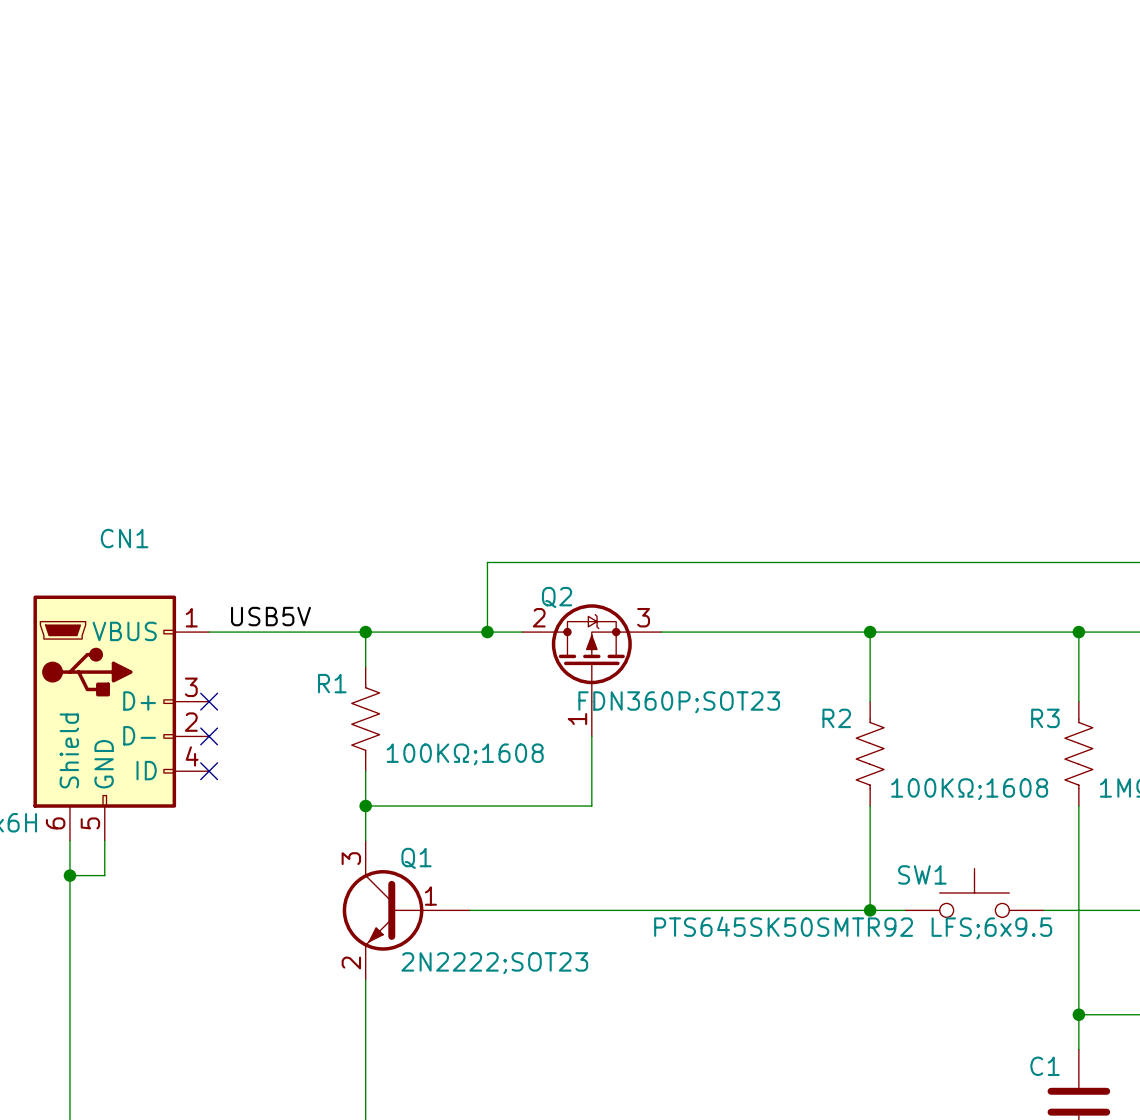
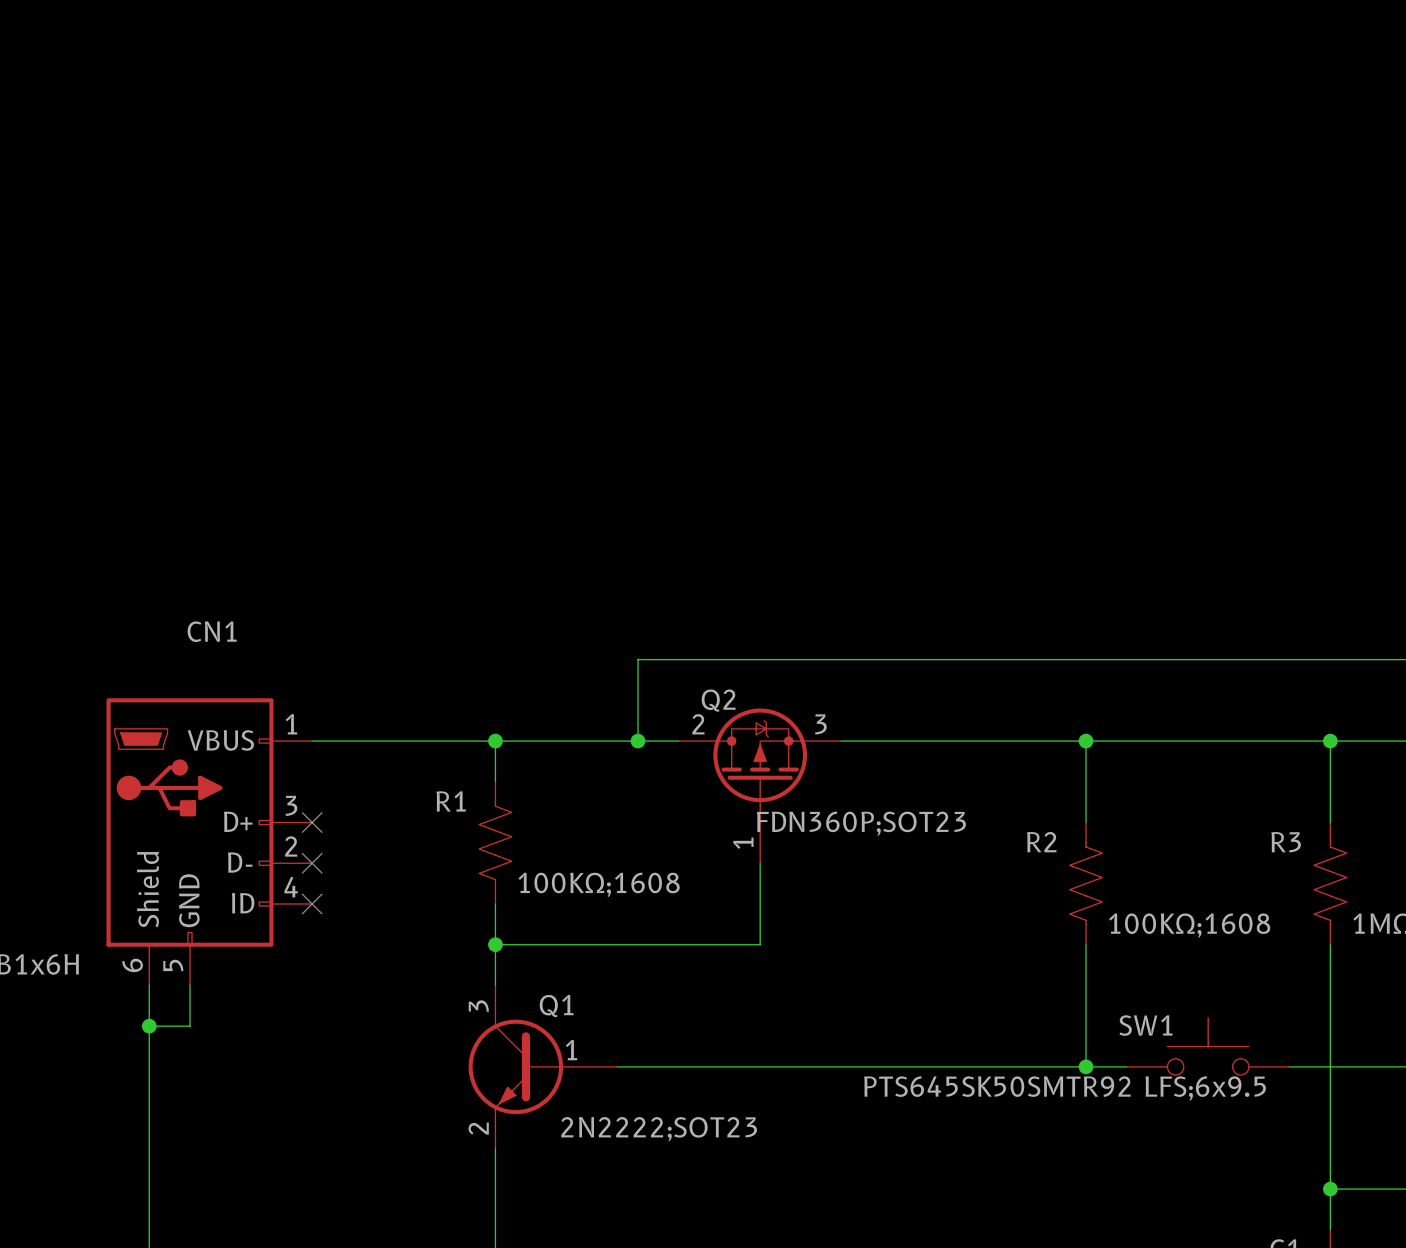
label: USB5V (270, 616) -> none

